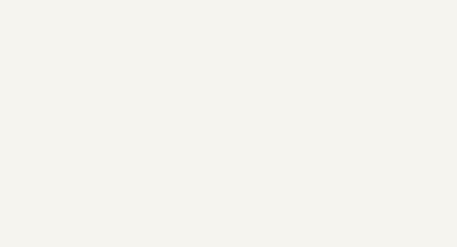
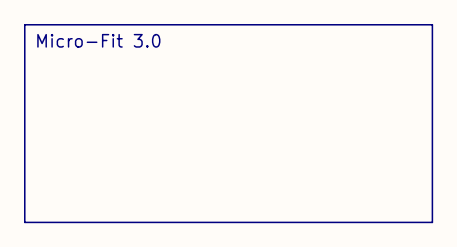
line: none -> (24, 24) (432, 24) (432, 222) (24, 222) (24, 24)
text: none -> Micro-Fit 3.0 (98, 40)

